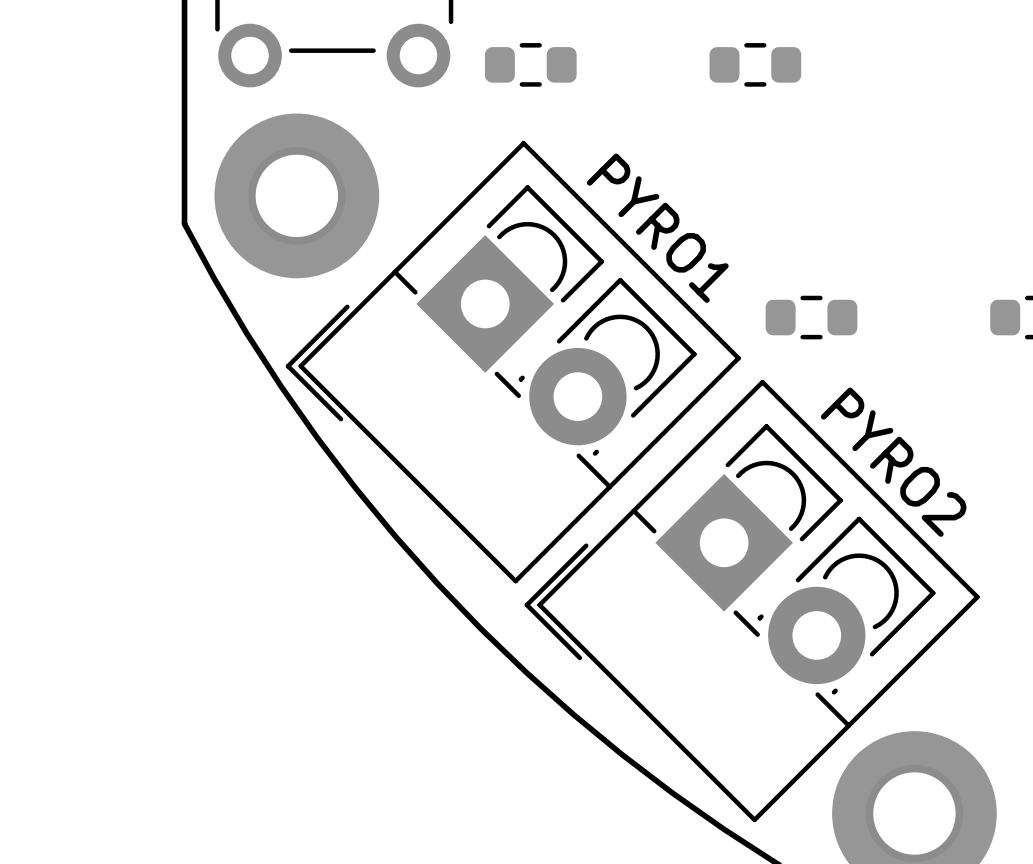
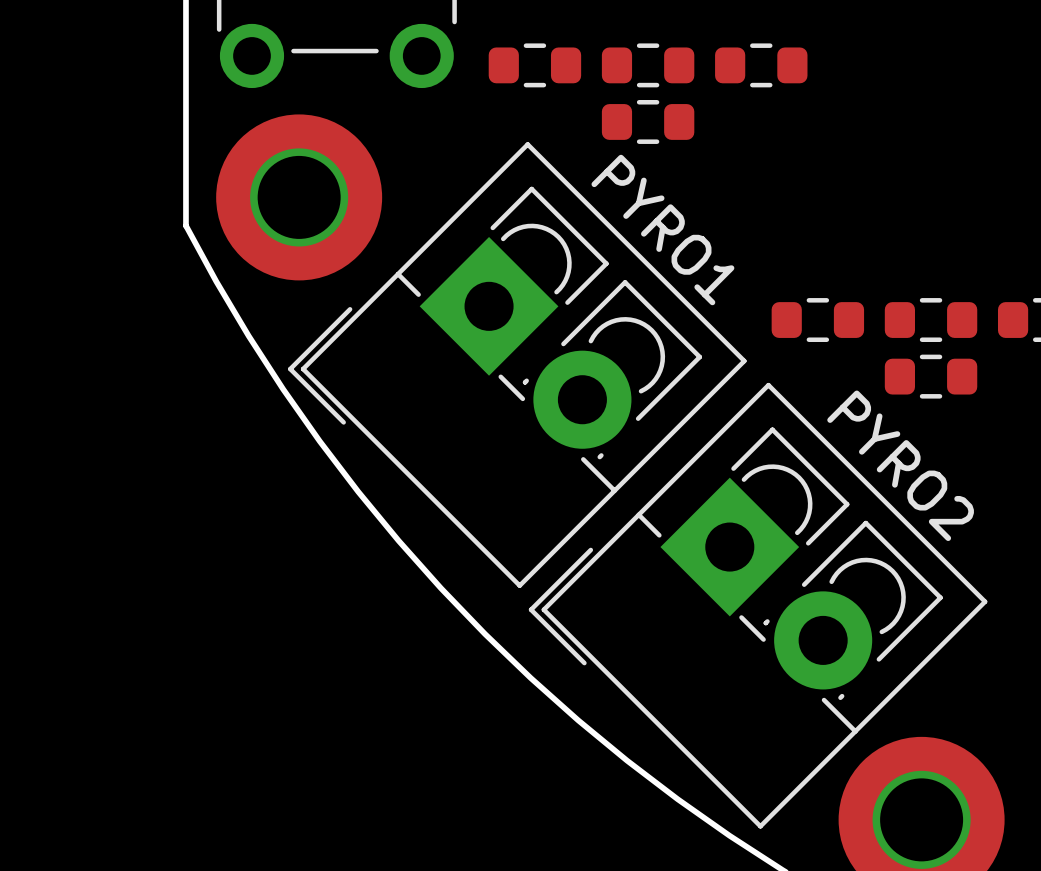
part: none -> (648, 65)
part: none -> (648, 121)
part: none -> (931, 320)
part: none -> (931, 376)

